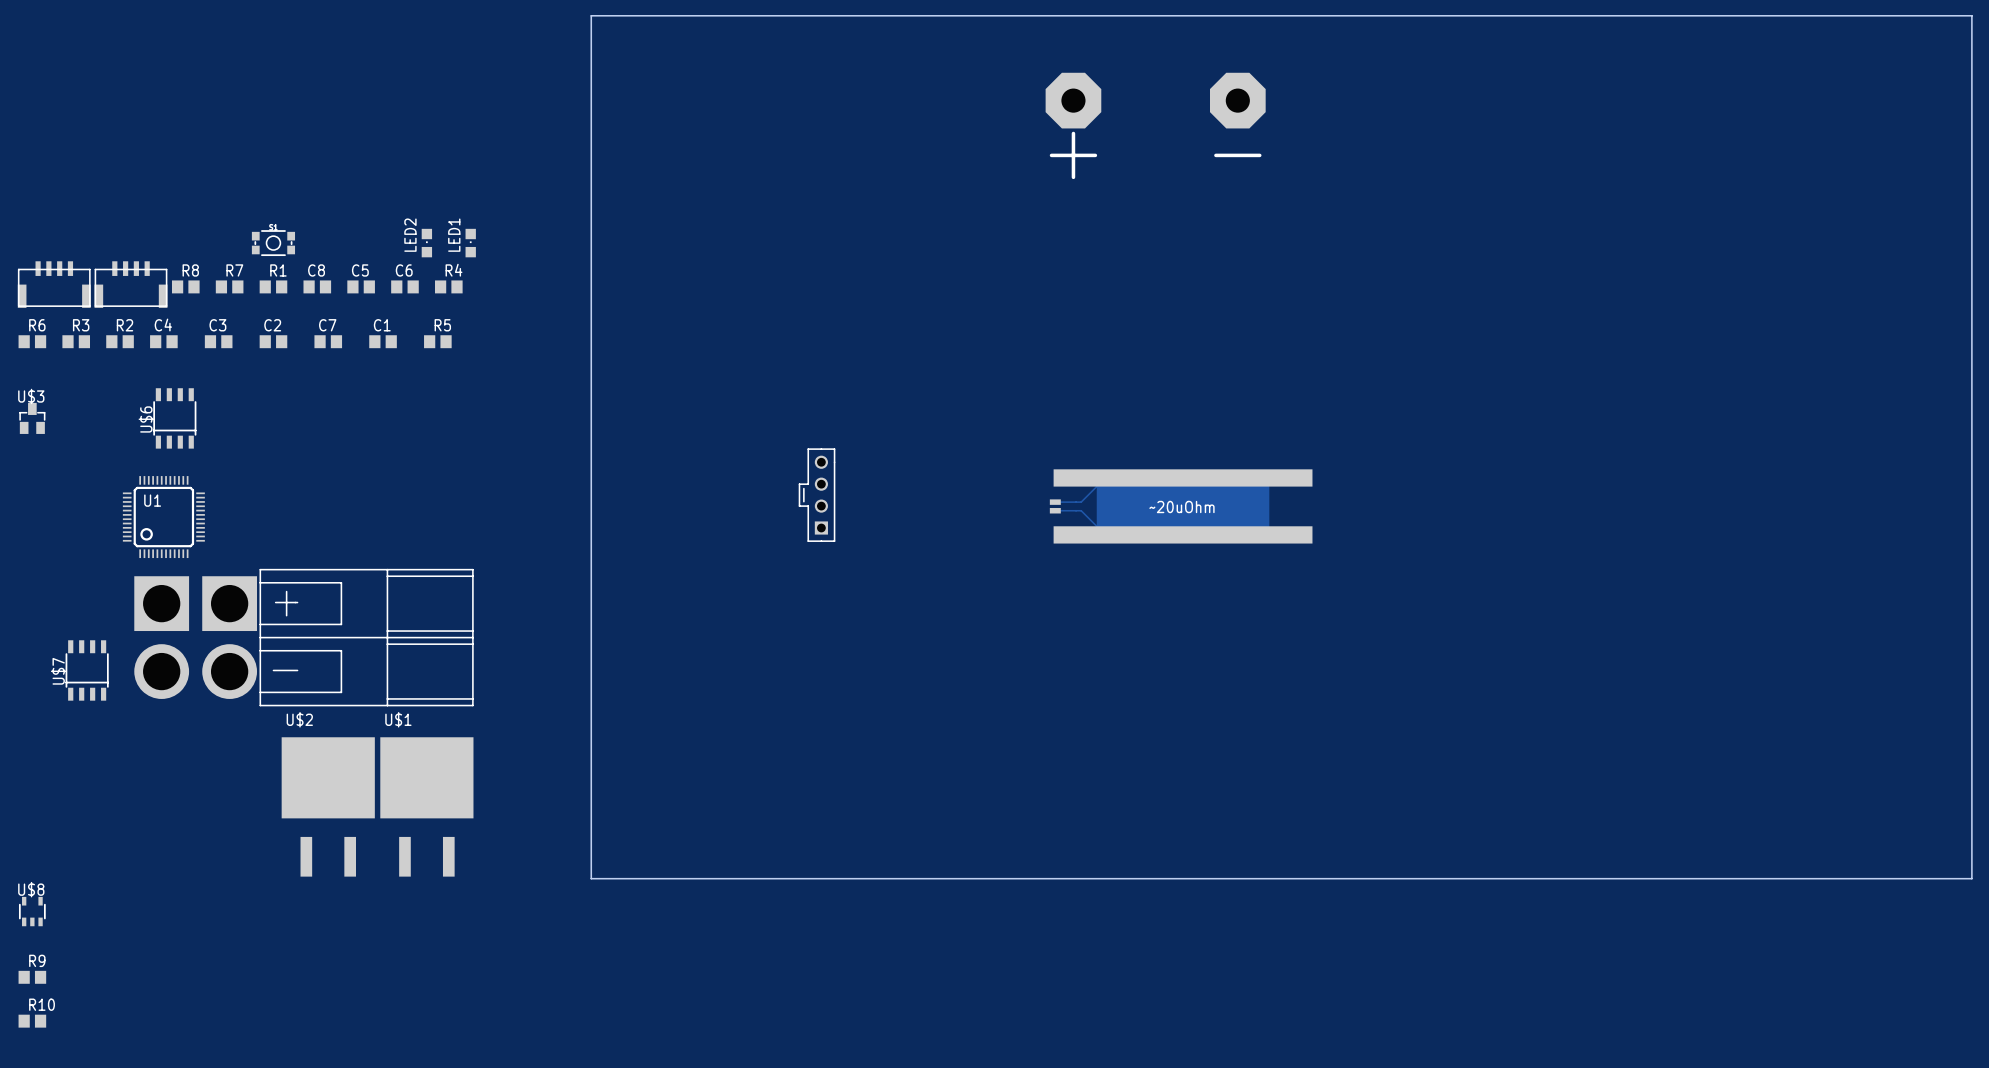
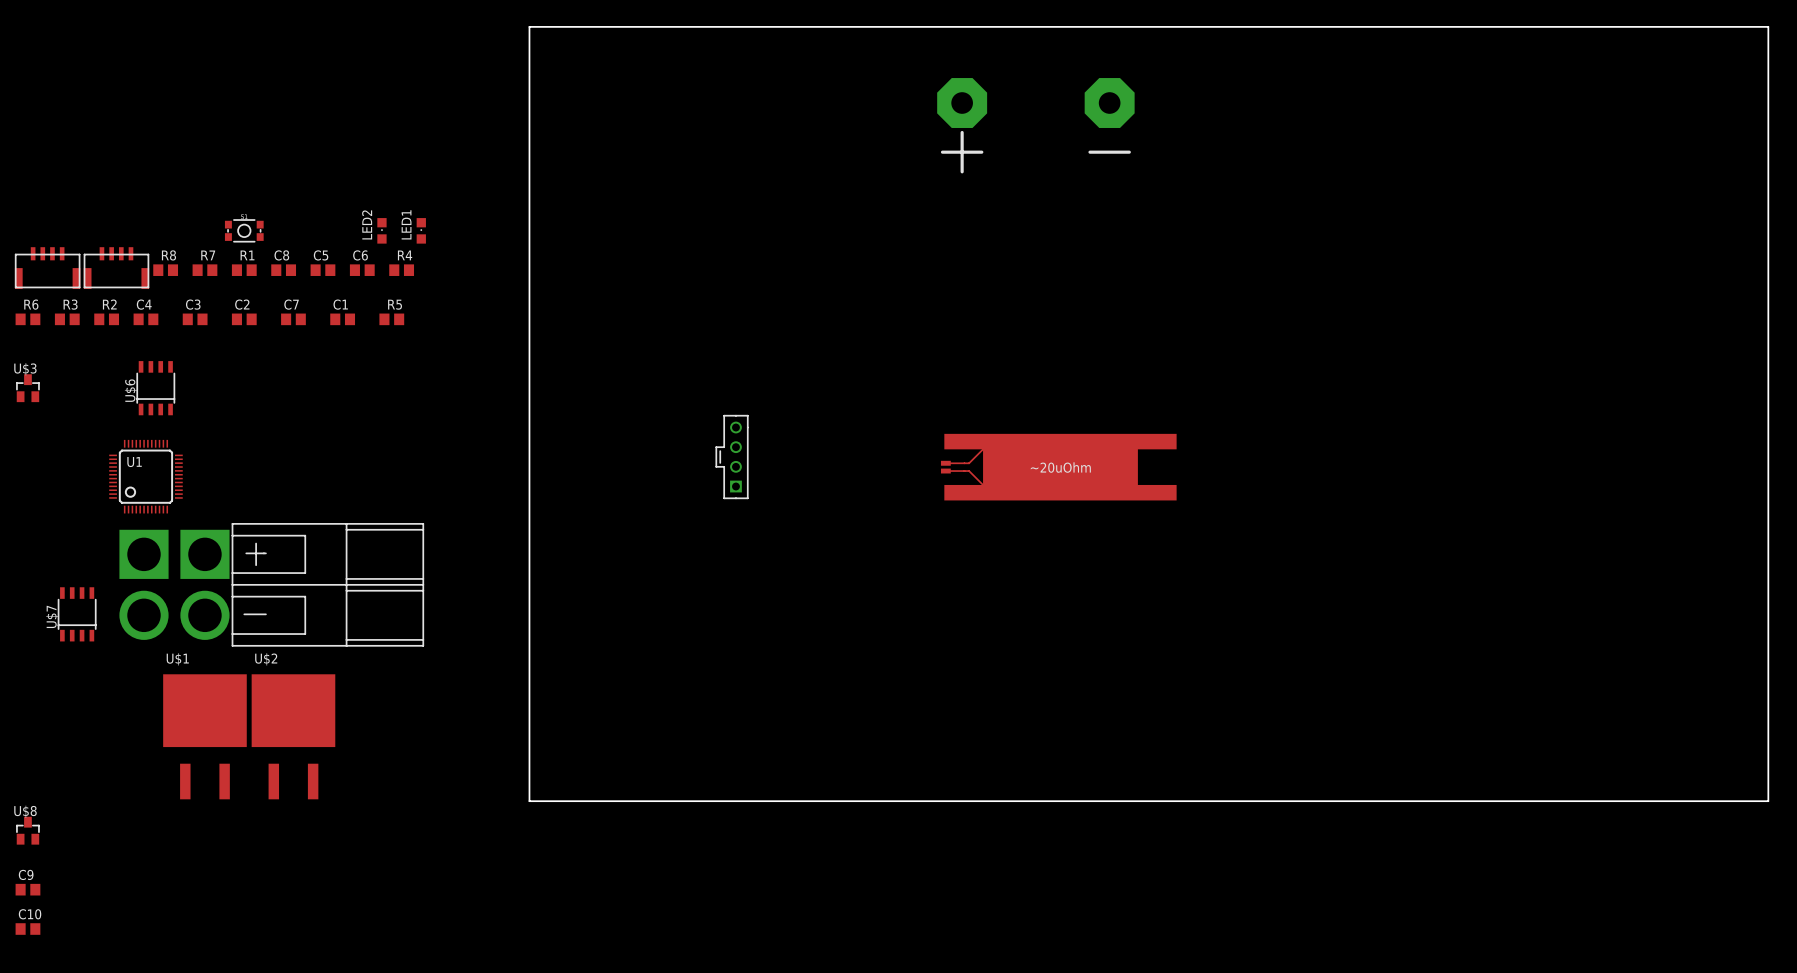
U$1 position: (426, 806) -> (204, 736)
U$8 footprint: [18, 896, 46, 927] -> [16, 816, 40, 845]
R9 name: R9 (37, 960) -> C9 (26, 874)
R10 name: R10 (42, 1004) -> C10 (30, 914)

